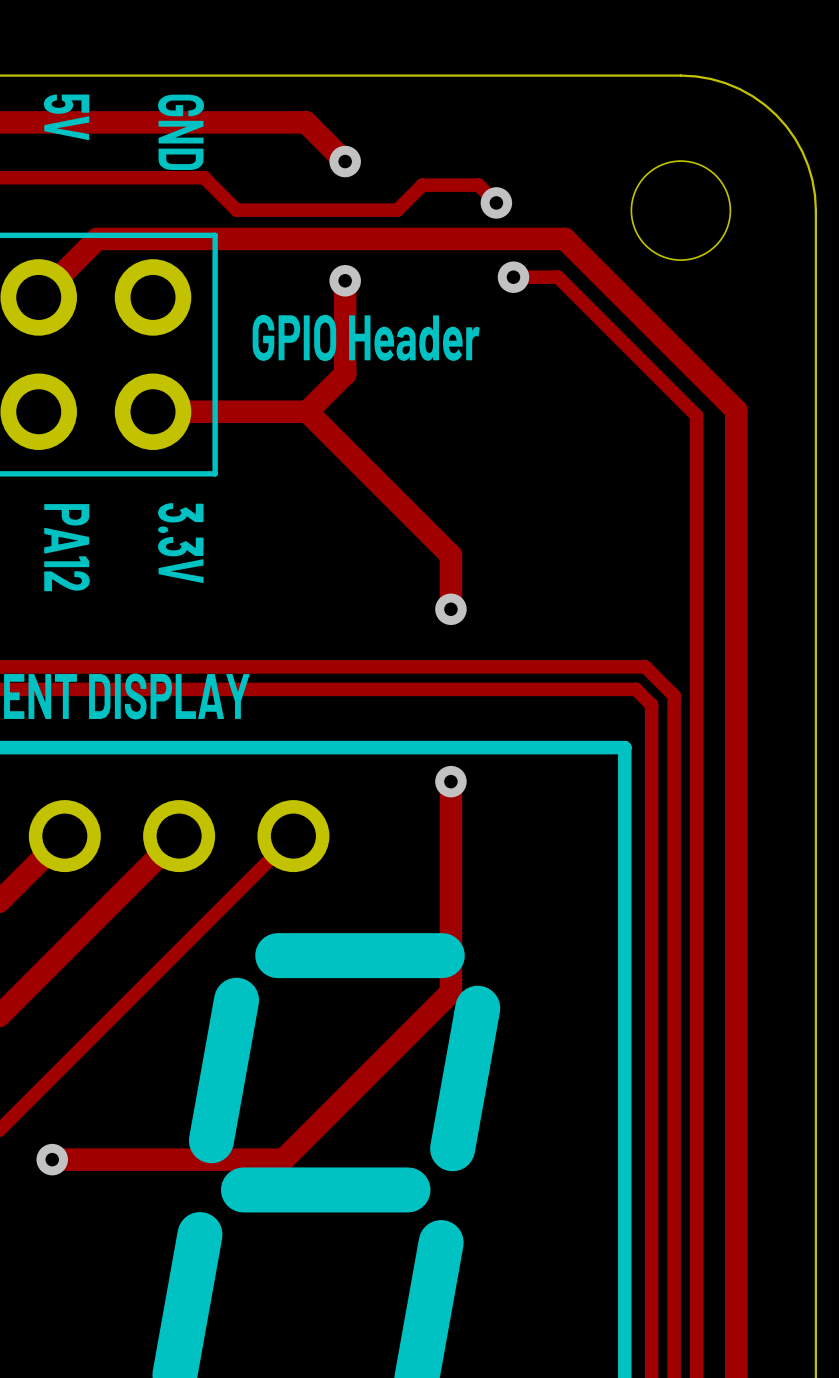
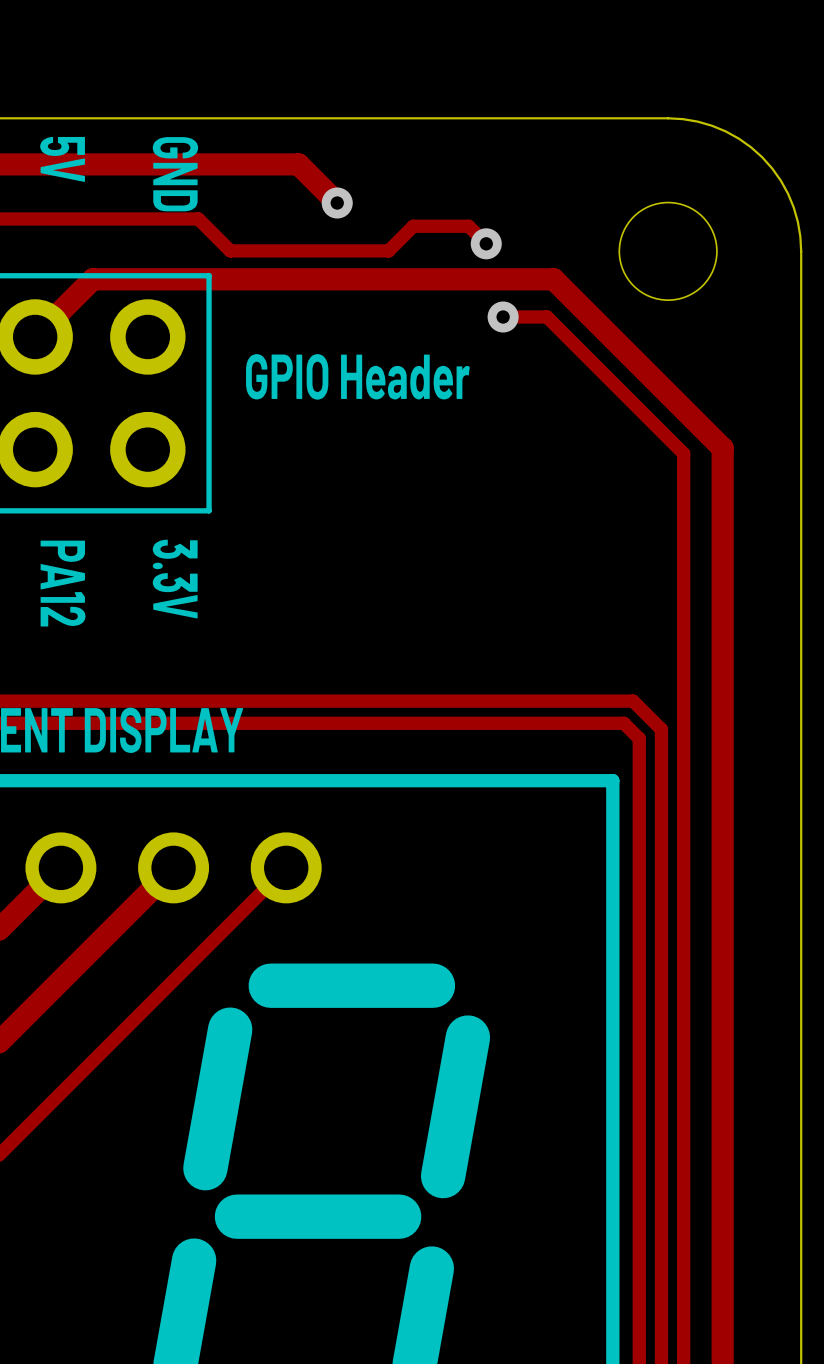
track: (345, 280) (345, 373) (307, 411) -> none
via: (345, 280) -> none
track: (153, 411) (307, 411) -> none
track: (307, 411) (450, 555) (450, 609) -> none
via: (450, 609) -> none
track: (450, 781) (450, 992) (283, 1159) (52, 1159) -> none
via: (450, 781) -> none
via: (52, 1159) -> none

